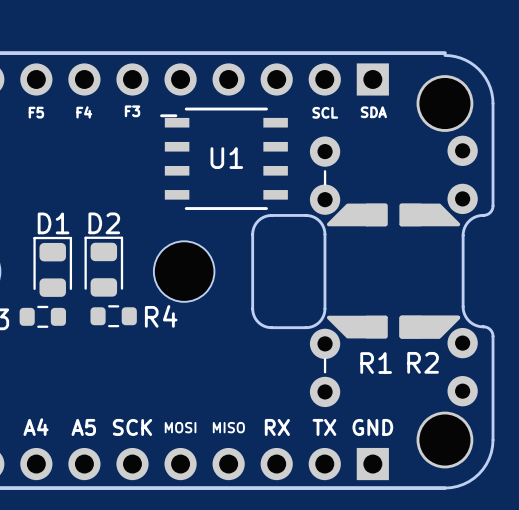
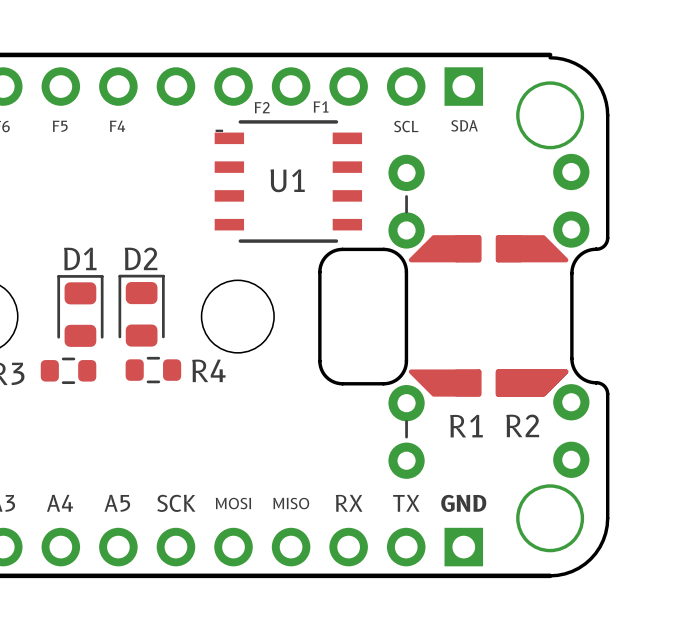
text: none -> F1 (321, 106)
text: none -> F2 (262, 107)
text: F3 (132, 111) -> none

